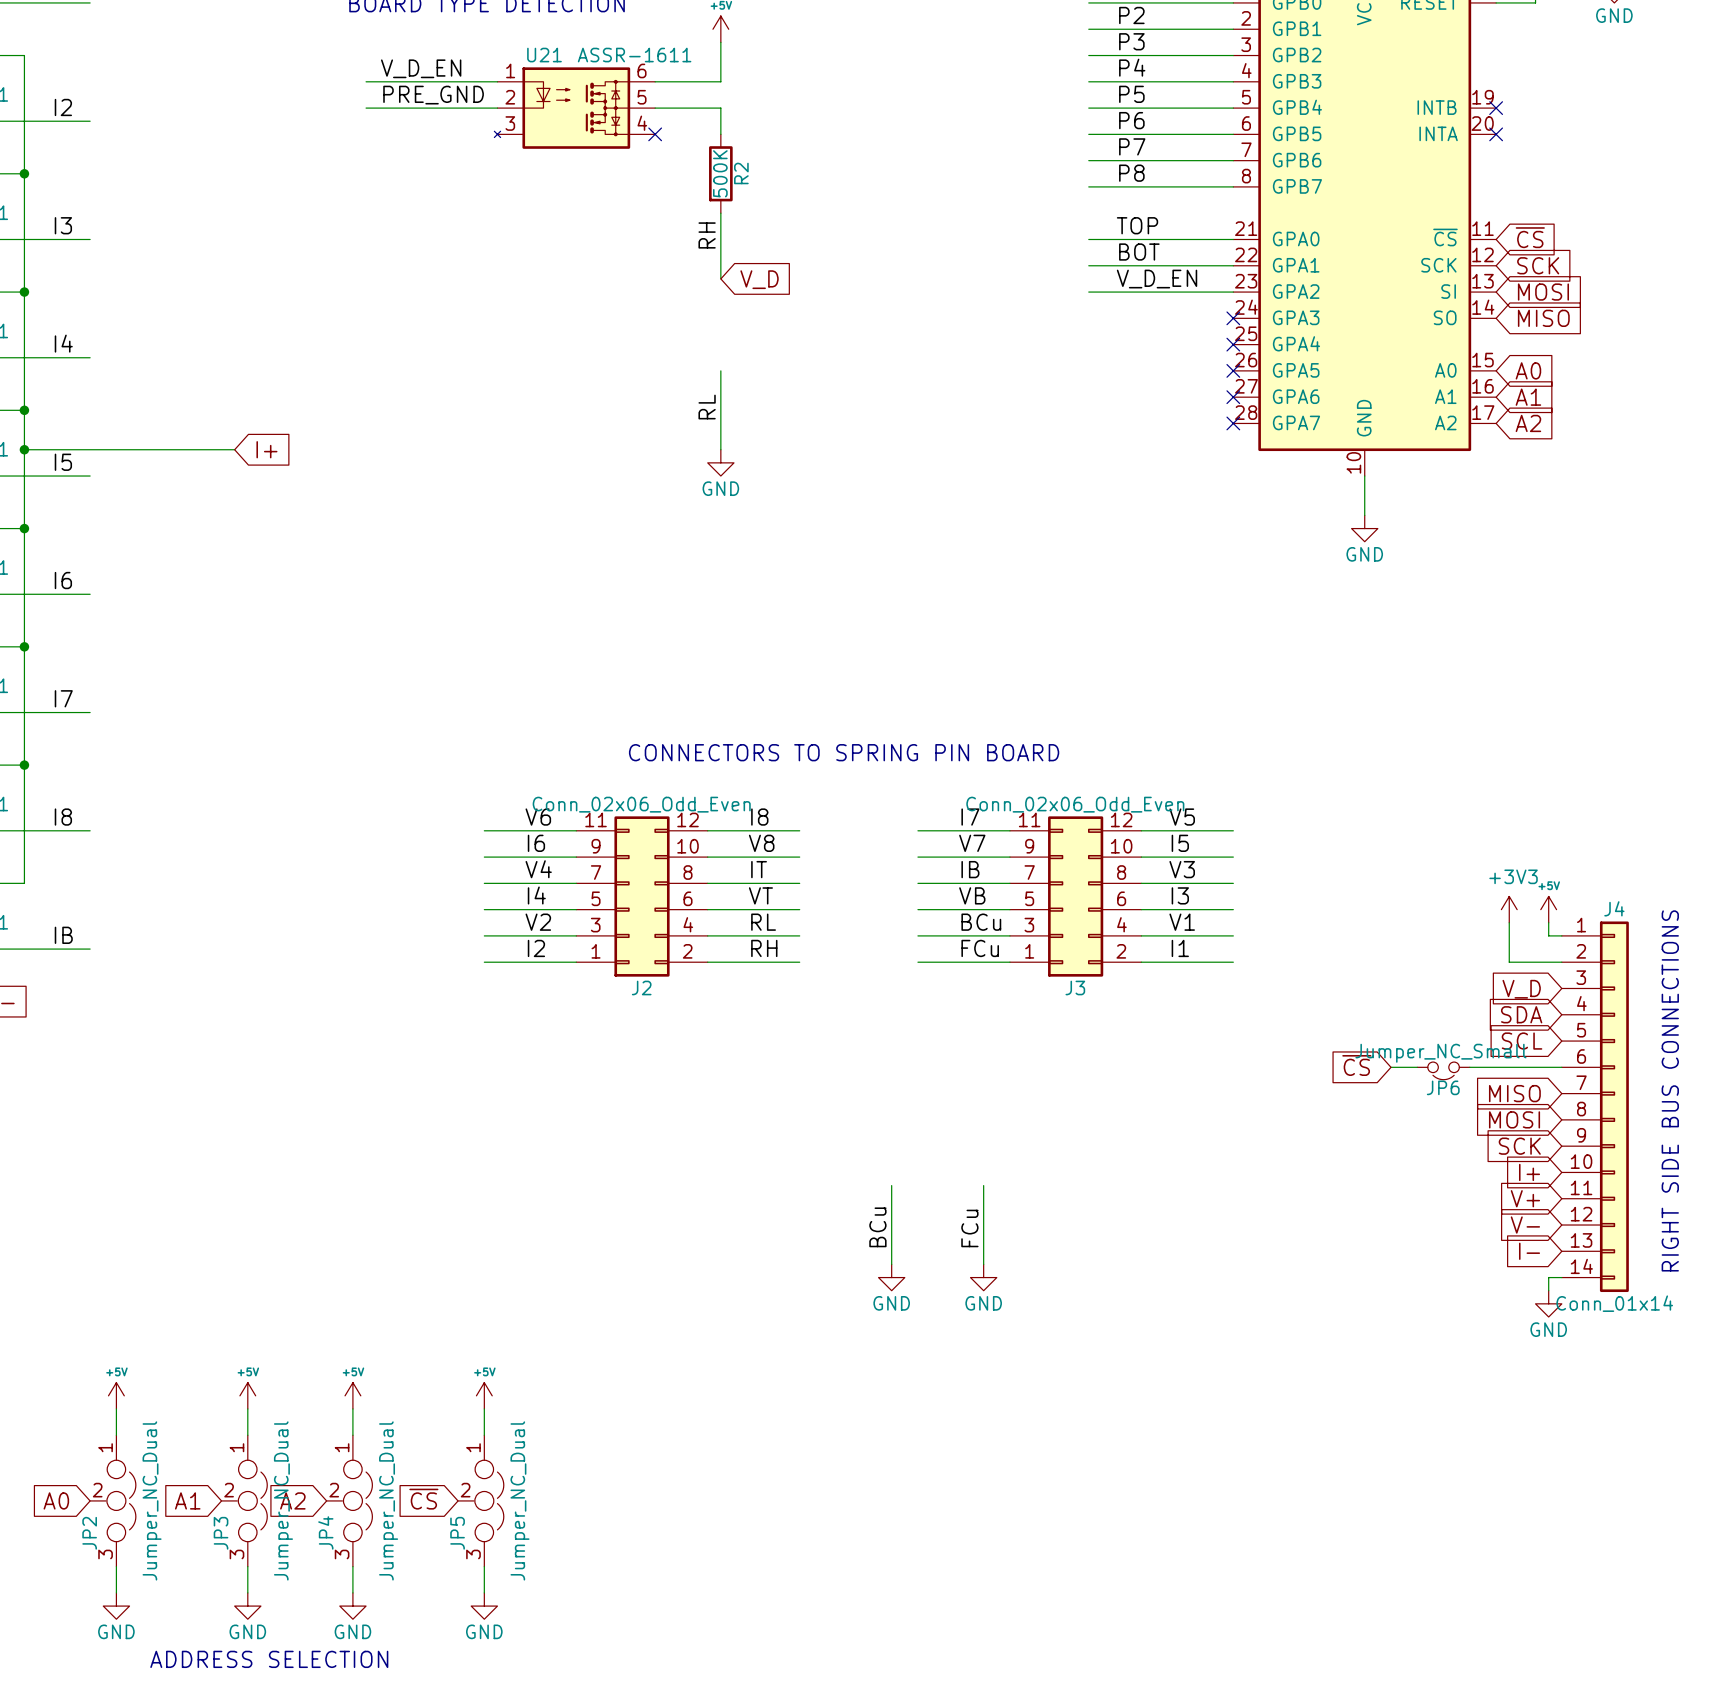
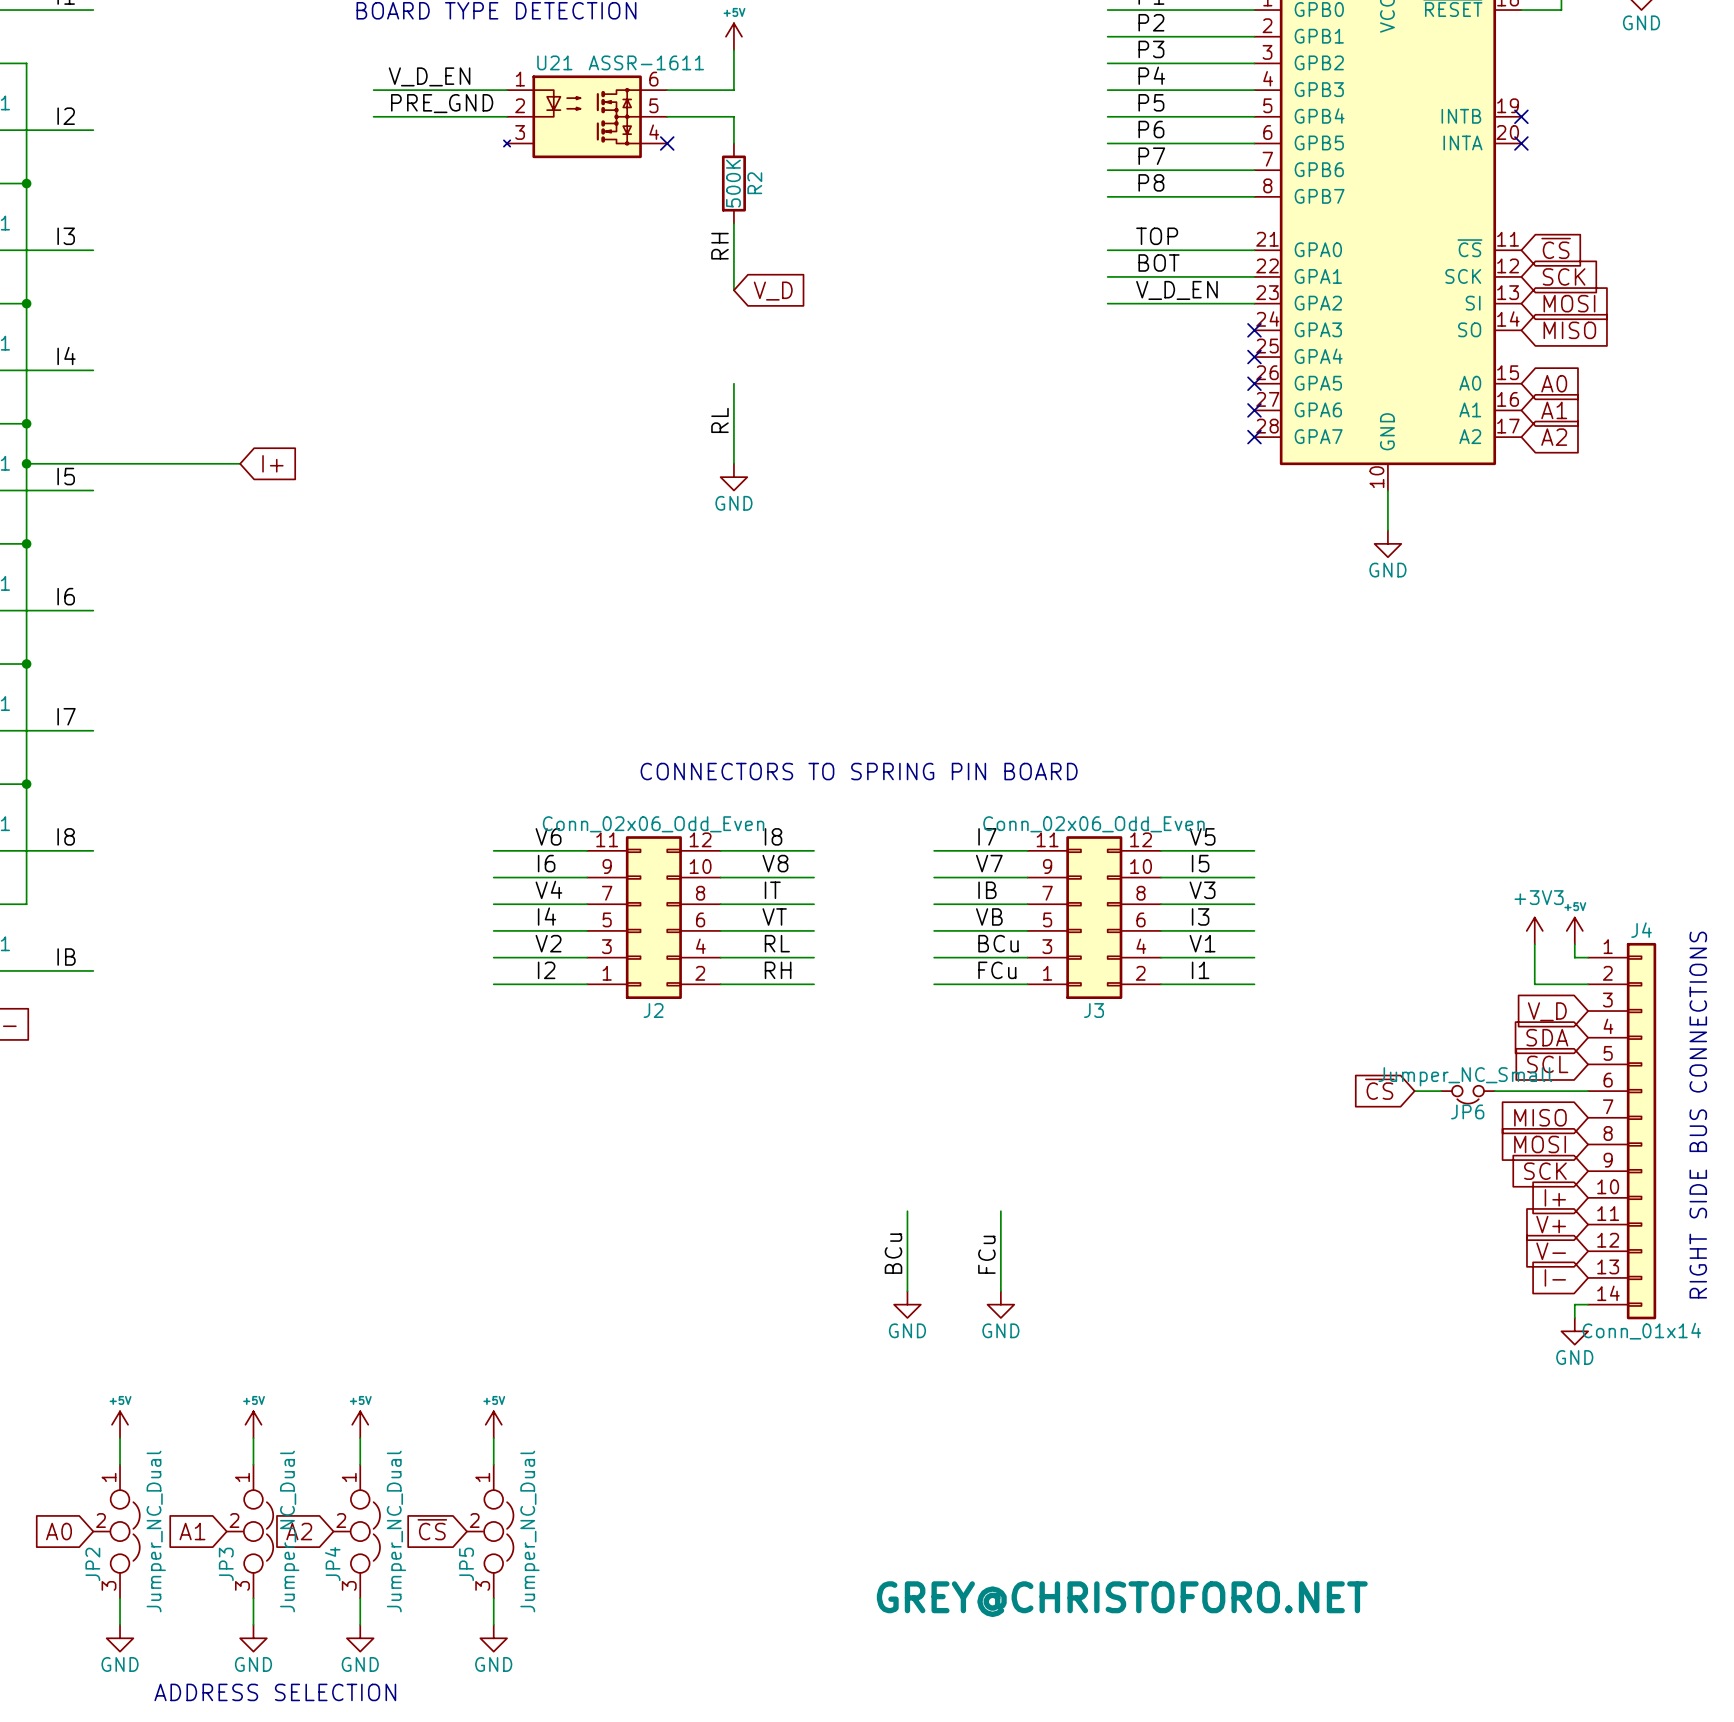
part: none -> GREY@CHRISTOFORO.NET (1122, 1599)

